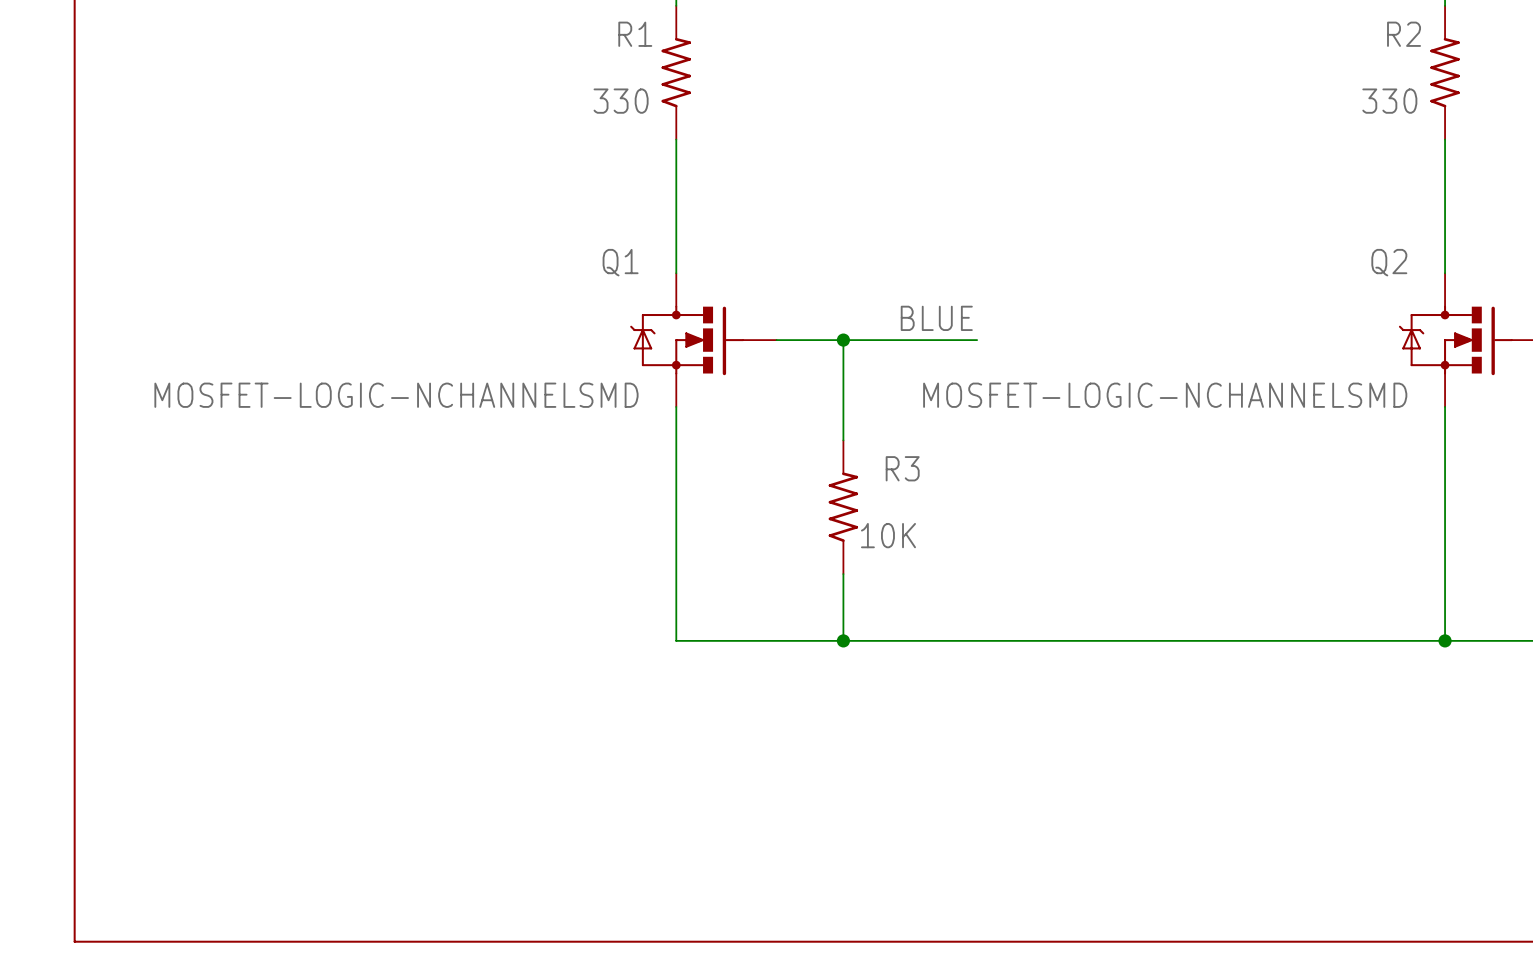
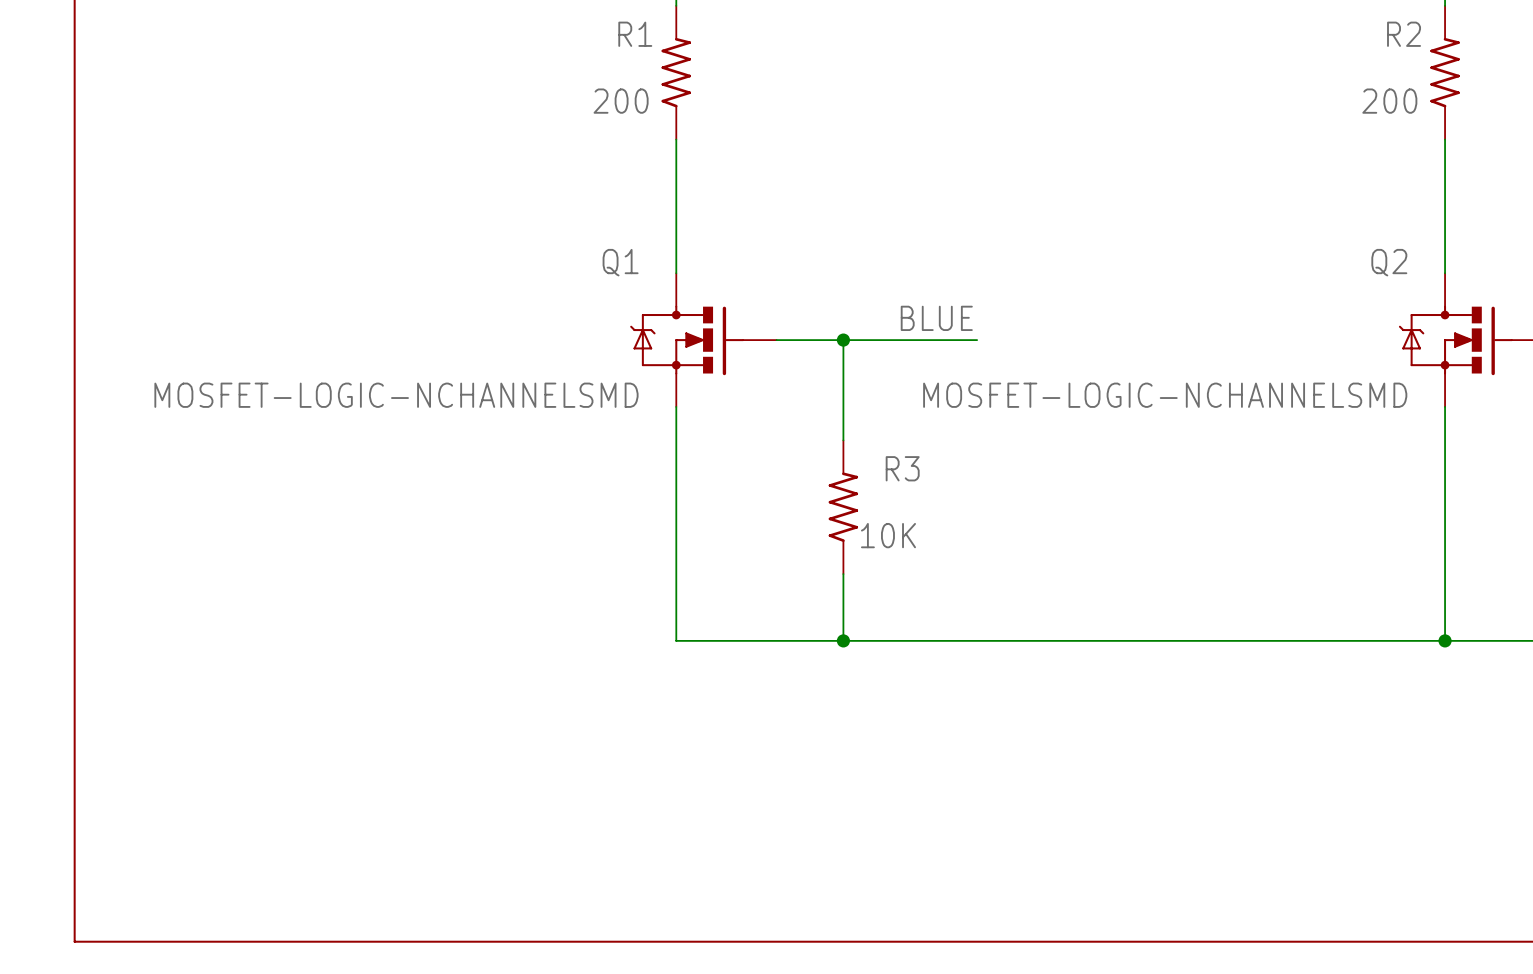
R1 value: 330 (621, 101) -> 200 (621, 101)
R2 value: 330 (1389, 101) -> 200 (1389, 101)

